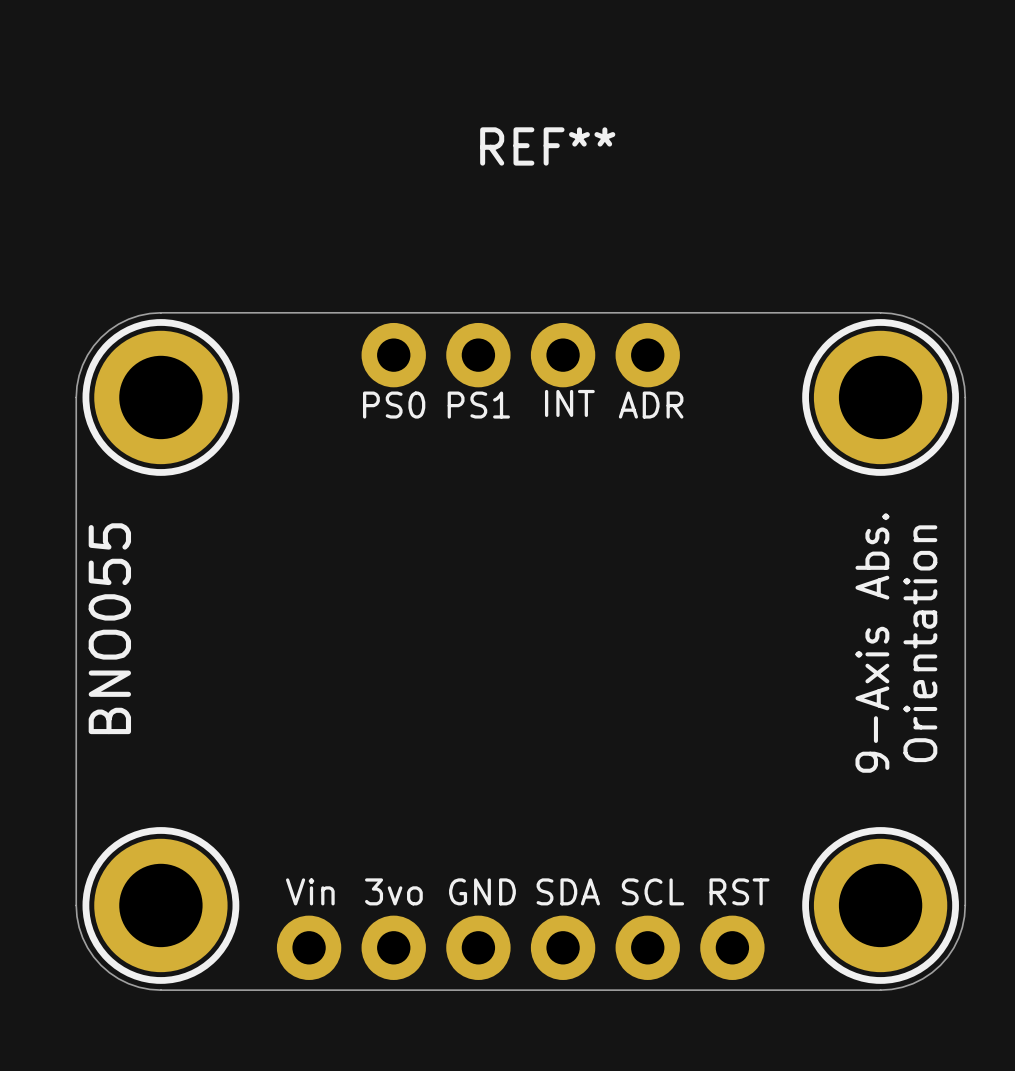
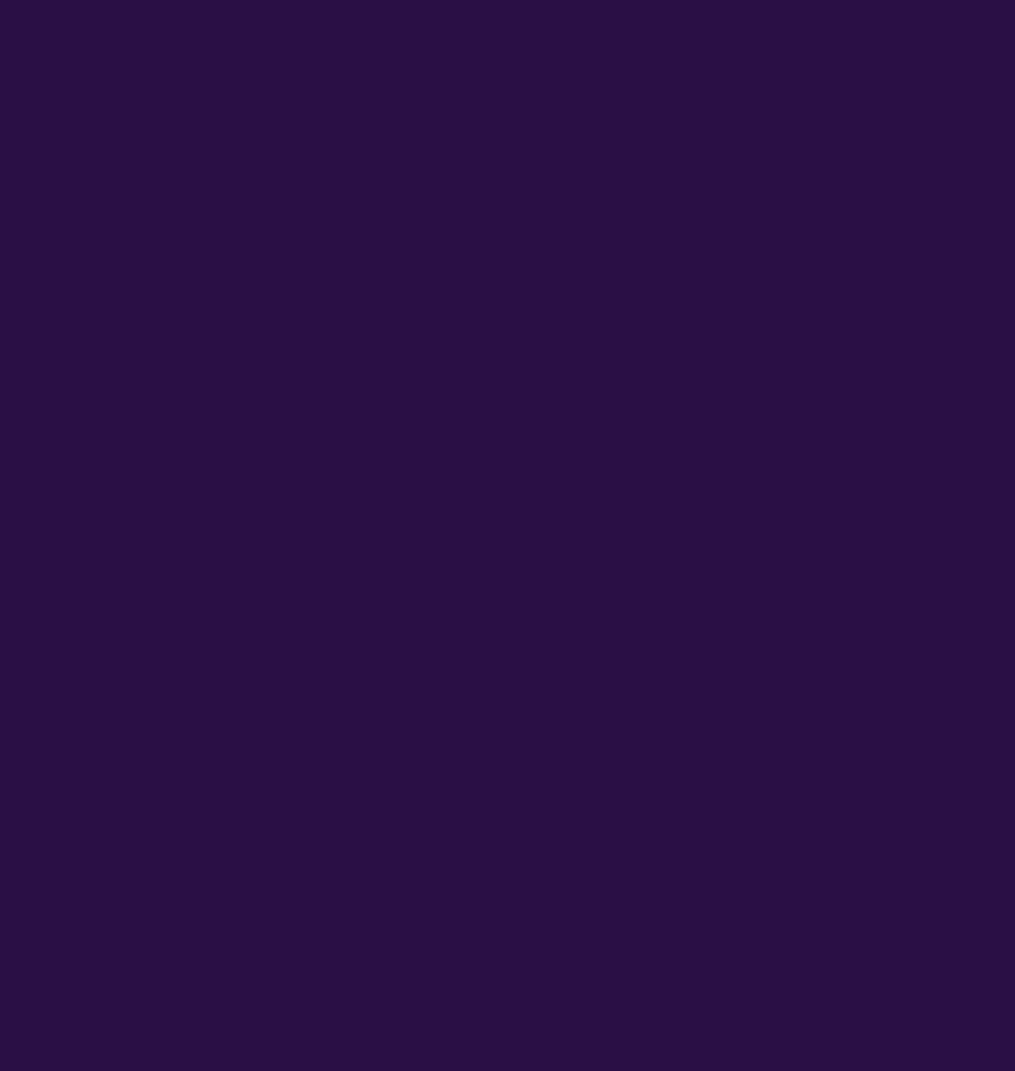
REF**: (520, 651) -> none

